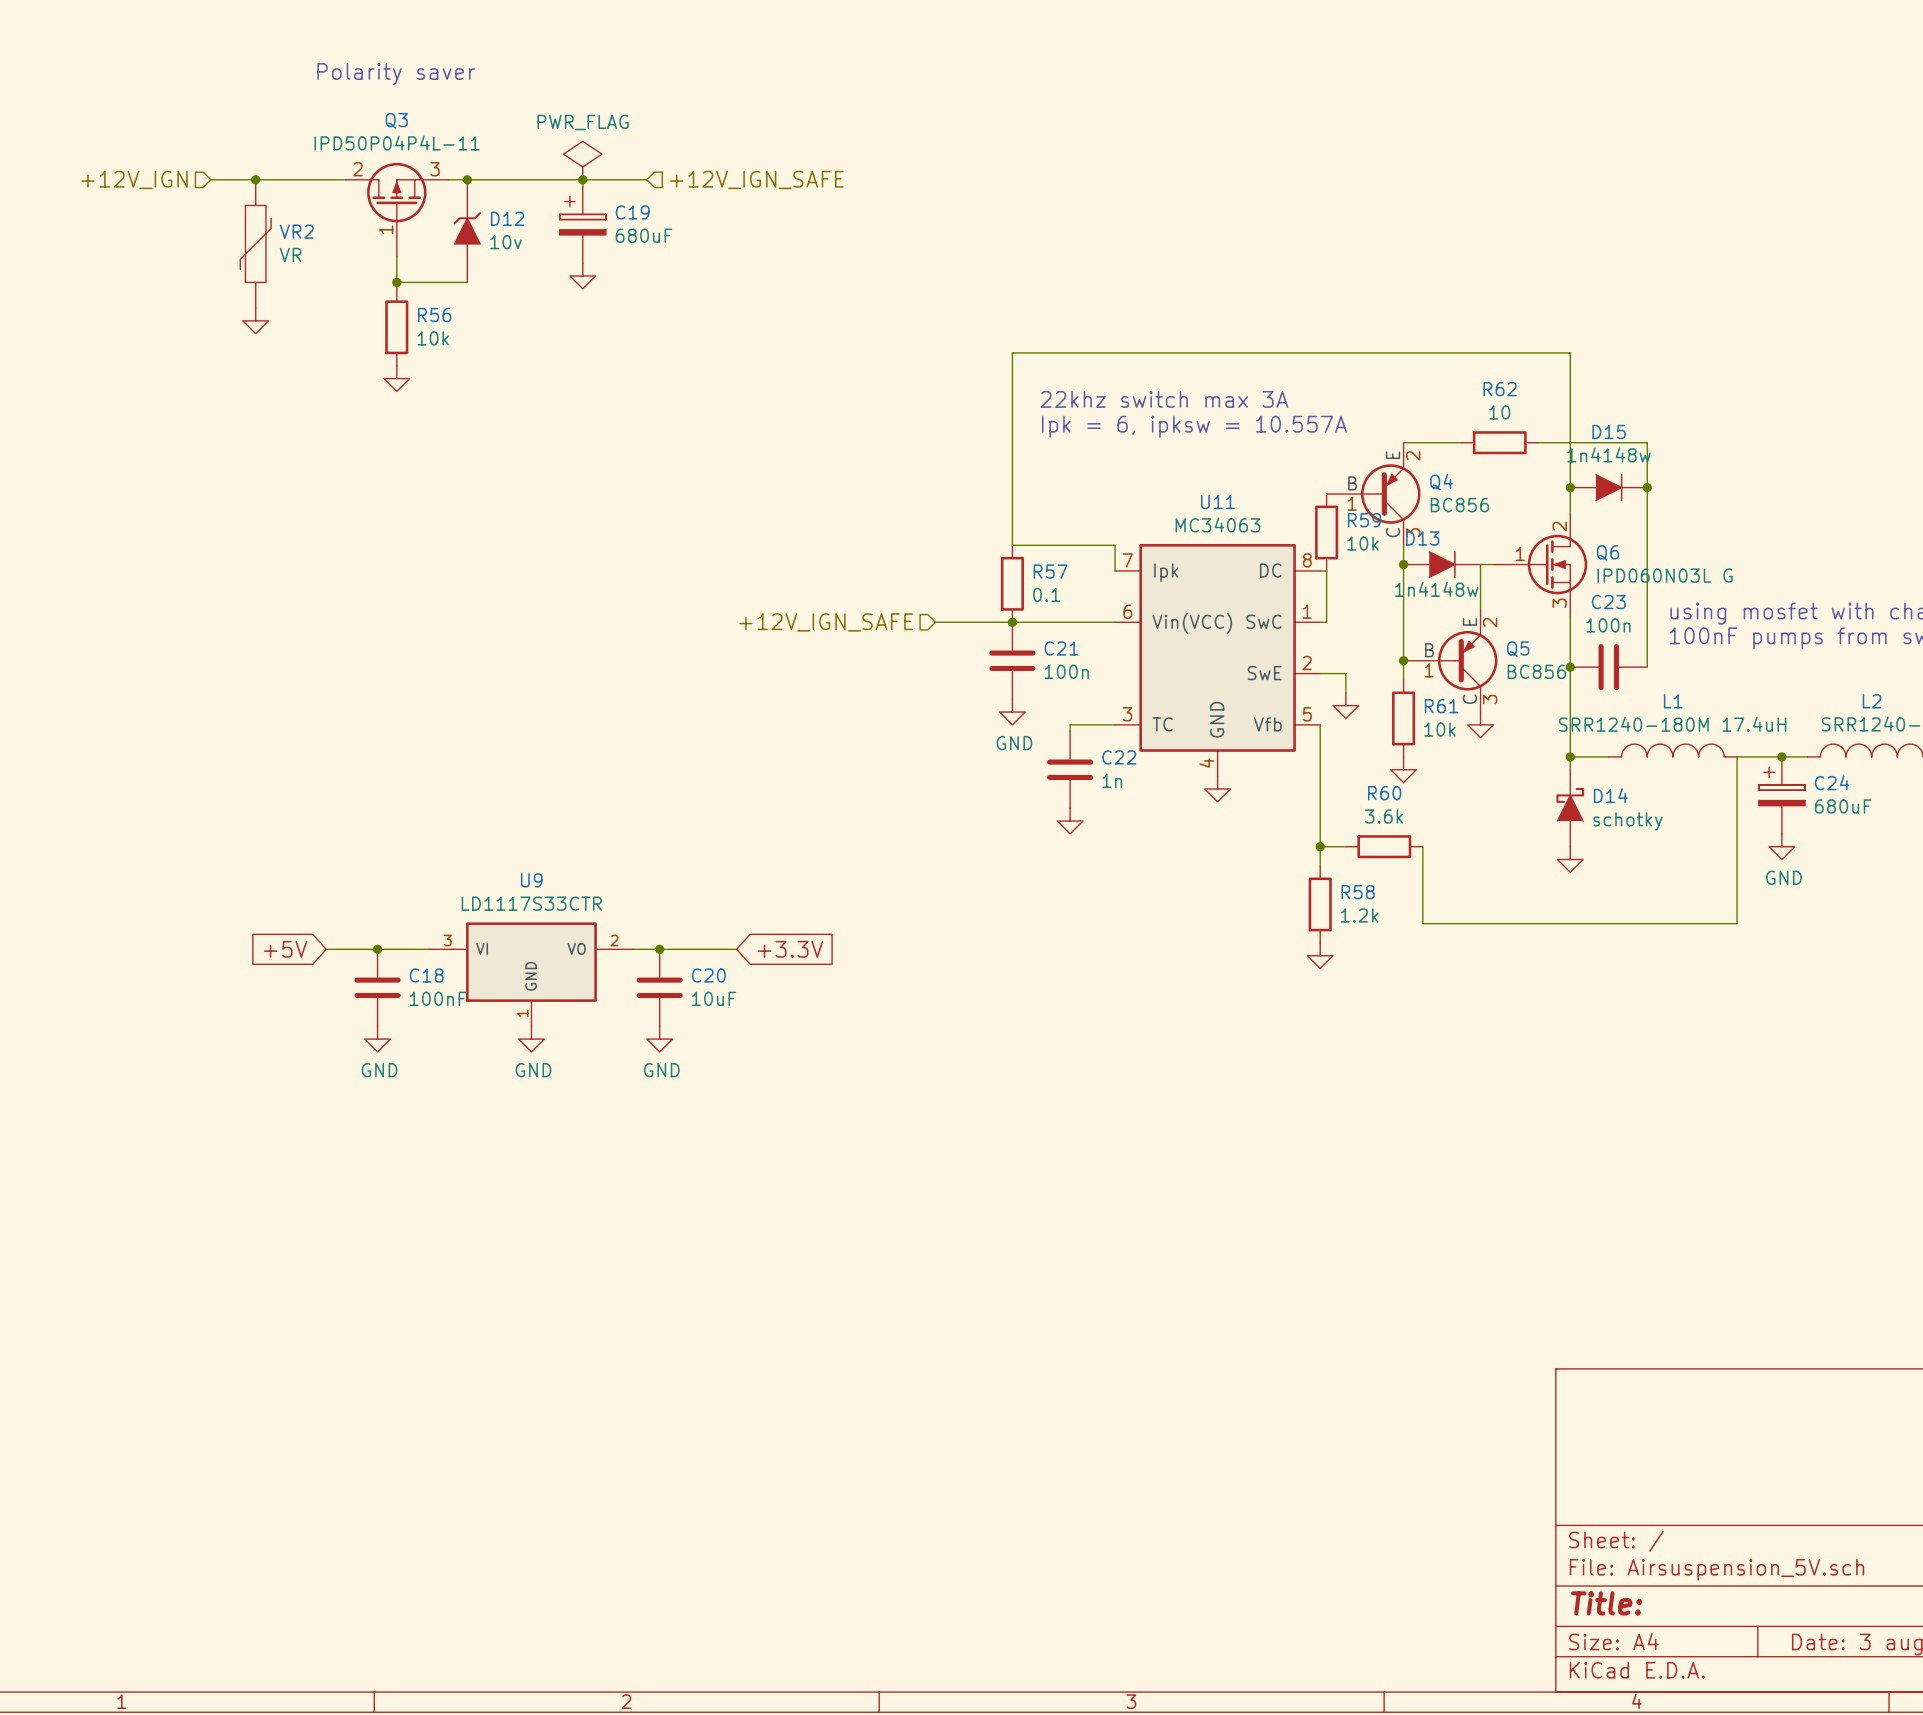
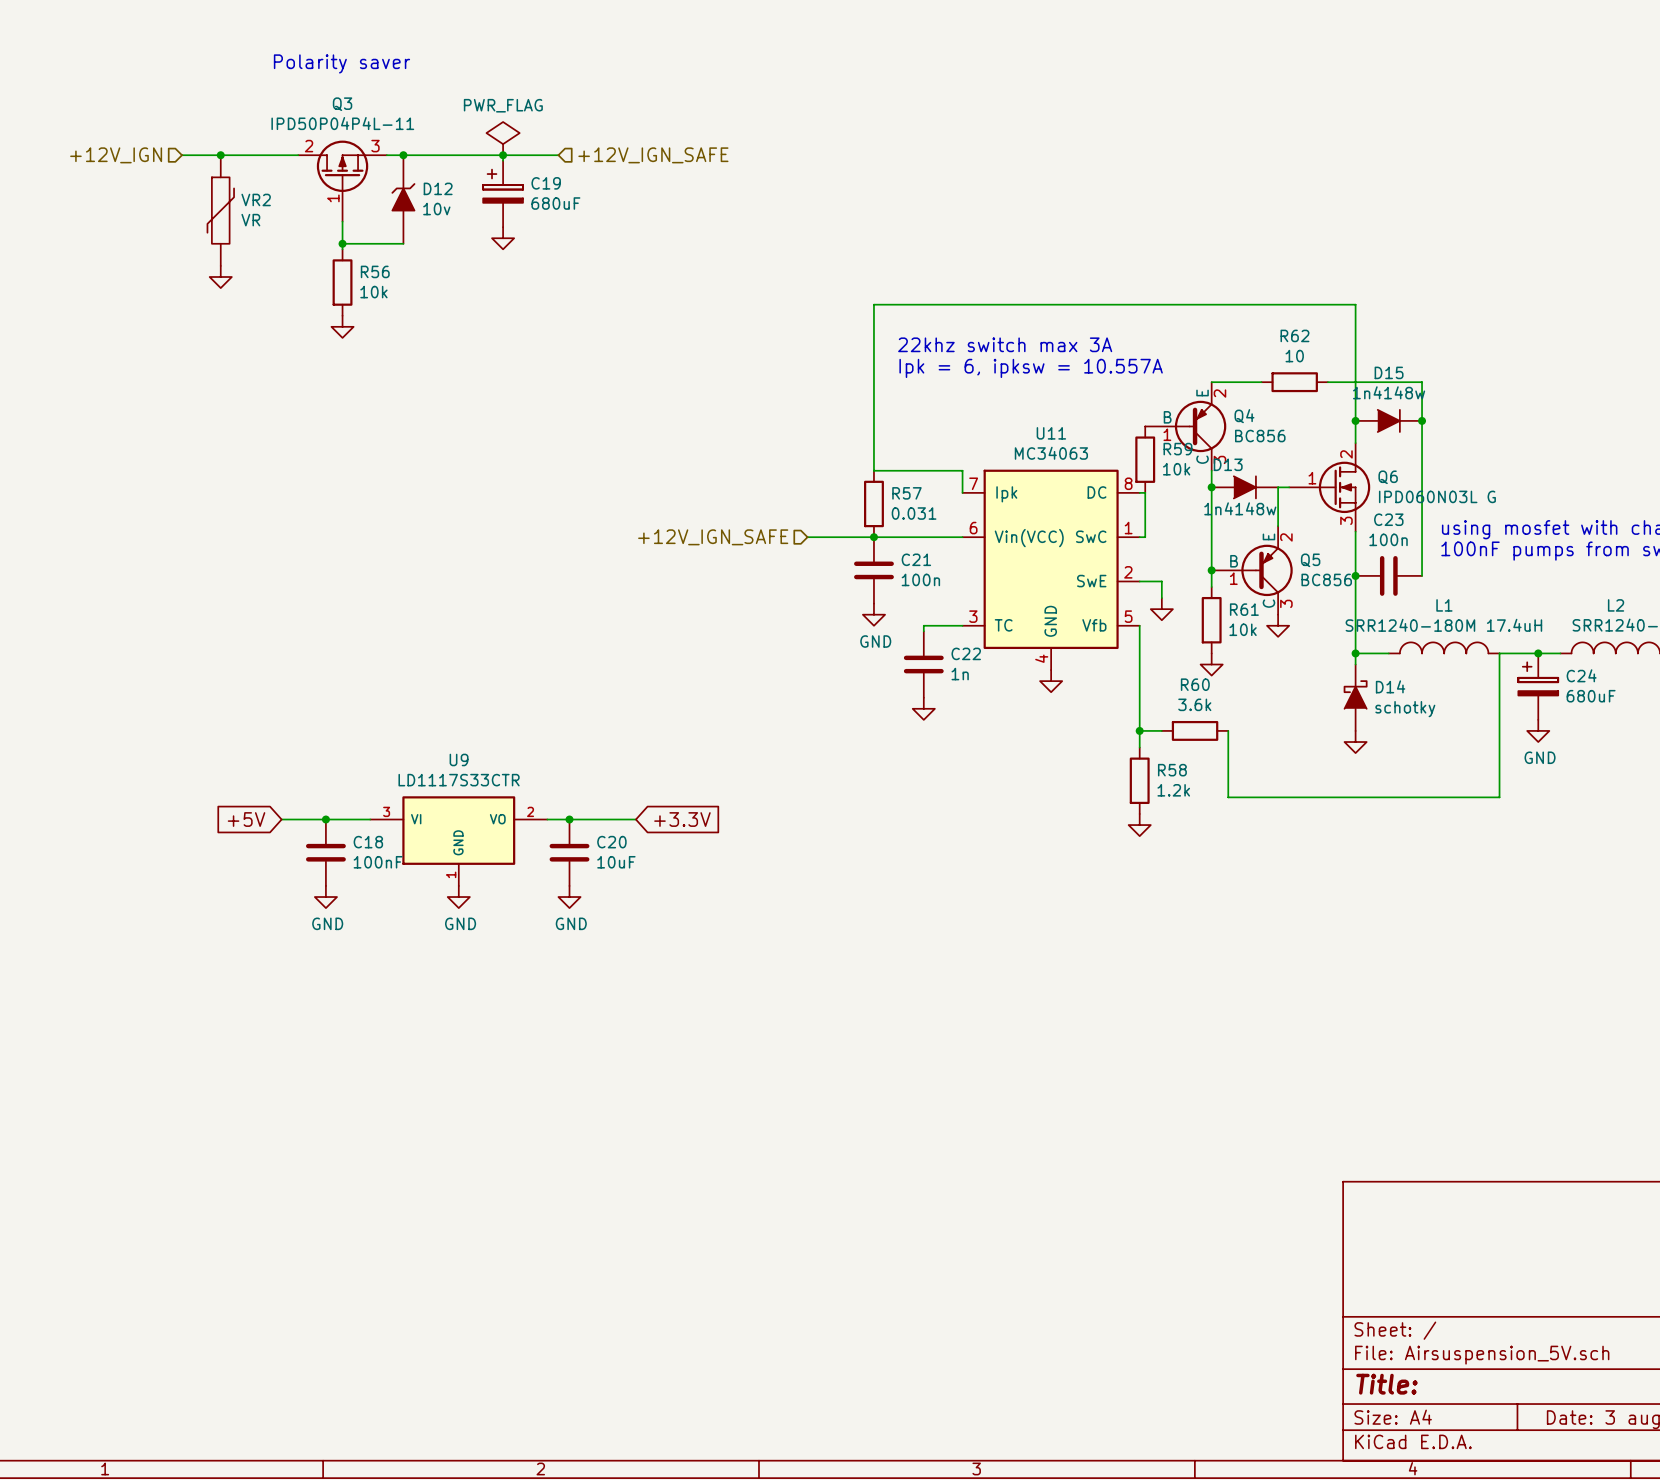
R57 value: 0.1 (1046, 594) -> 0.031 (914, 513)

